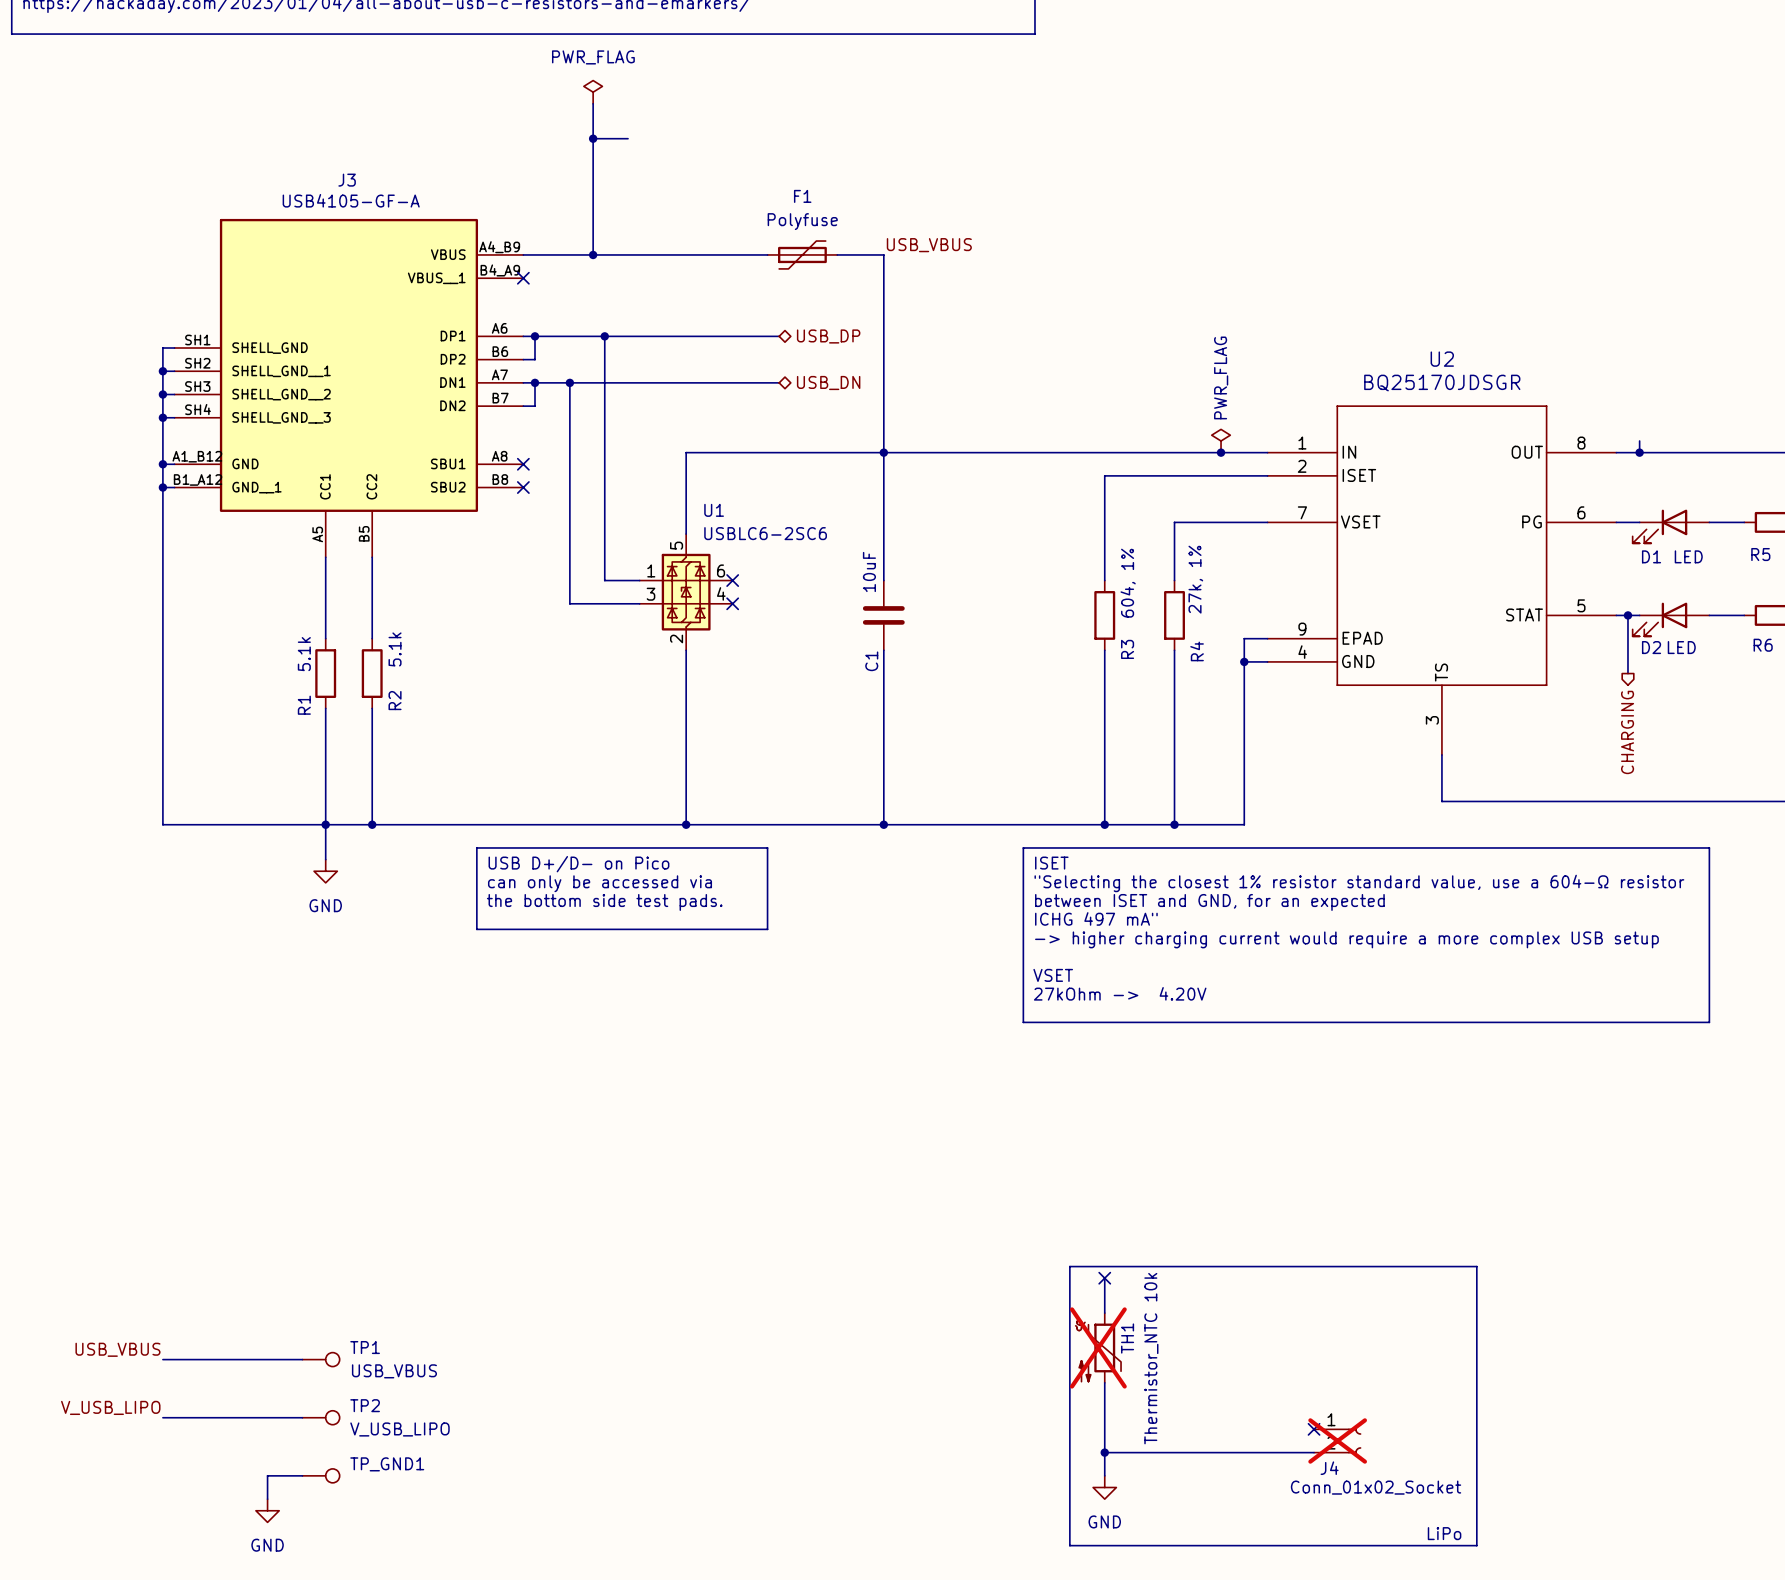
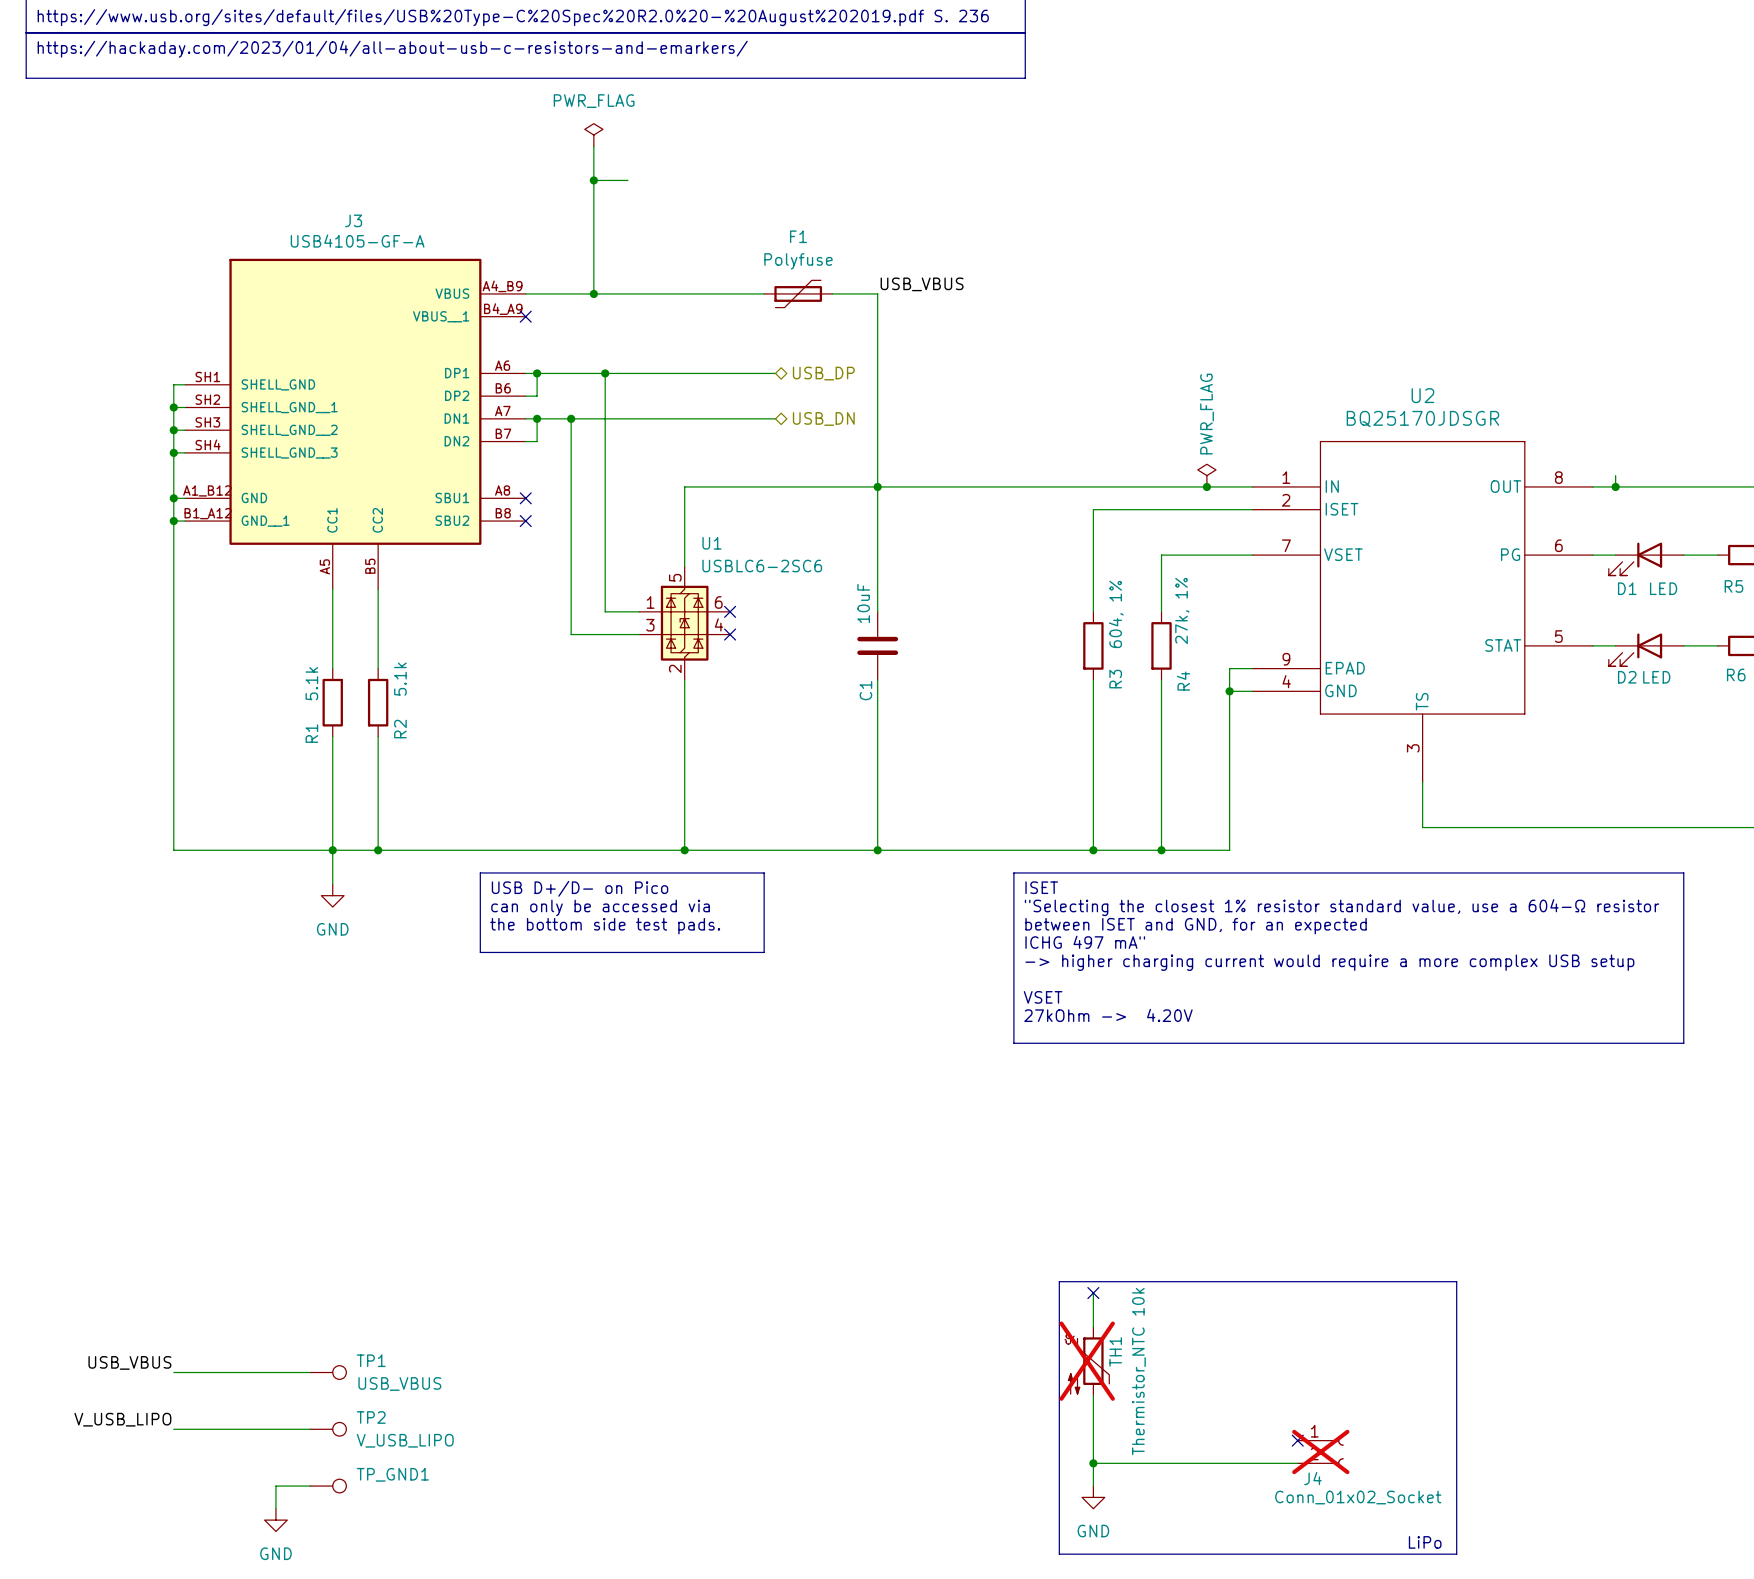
wire: (1627, 615) (1627, 673) -> none
junction: (1627, 615) -> none
hierarchical label: CHARGING (1627, 732) -> none

